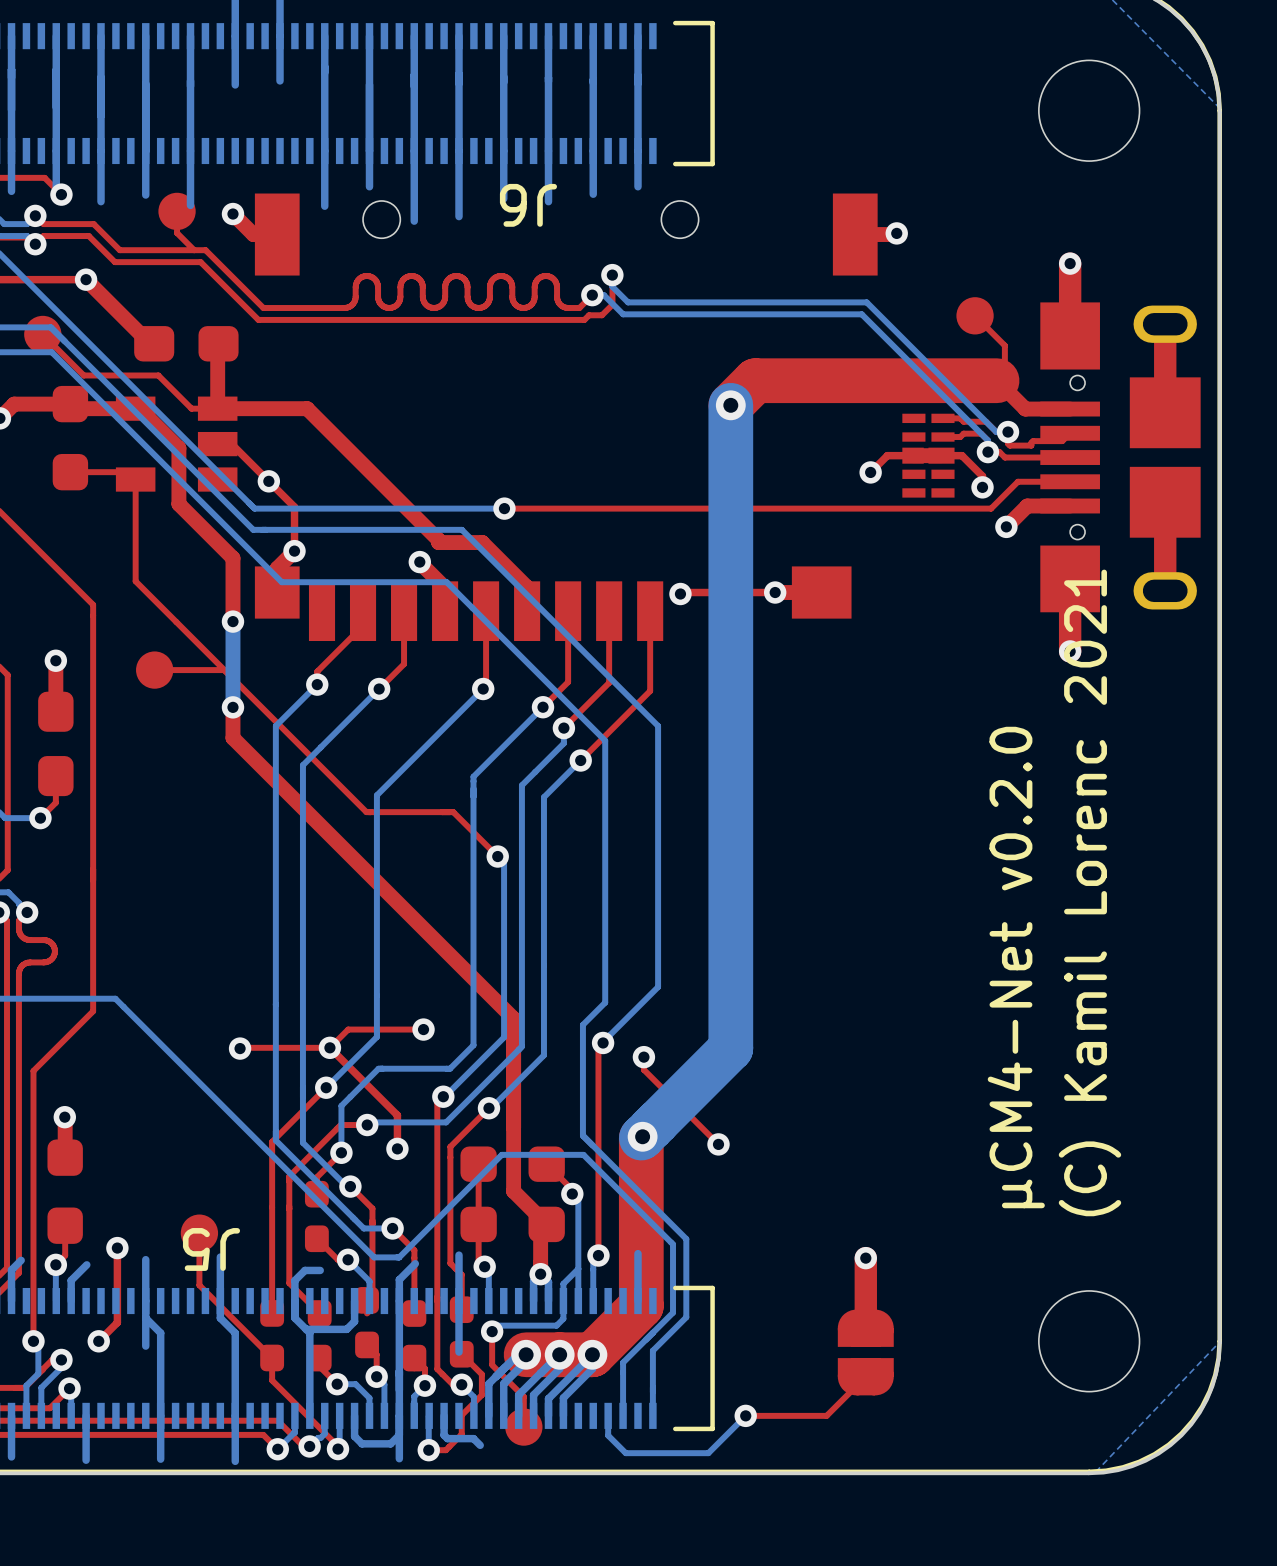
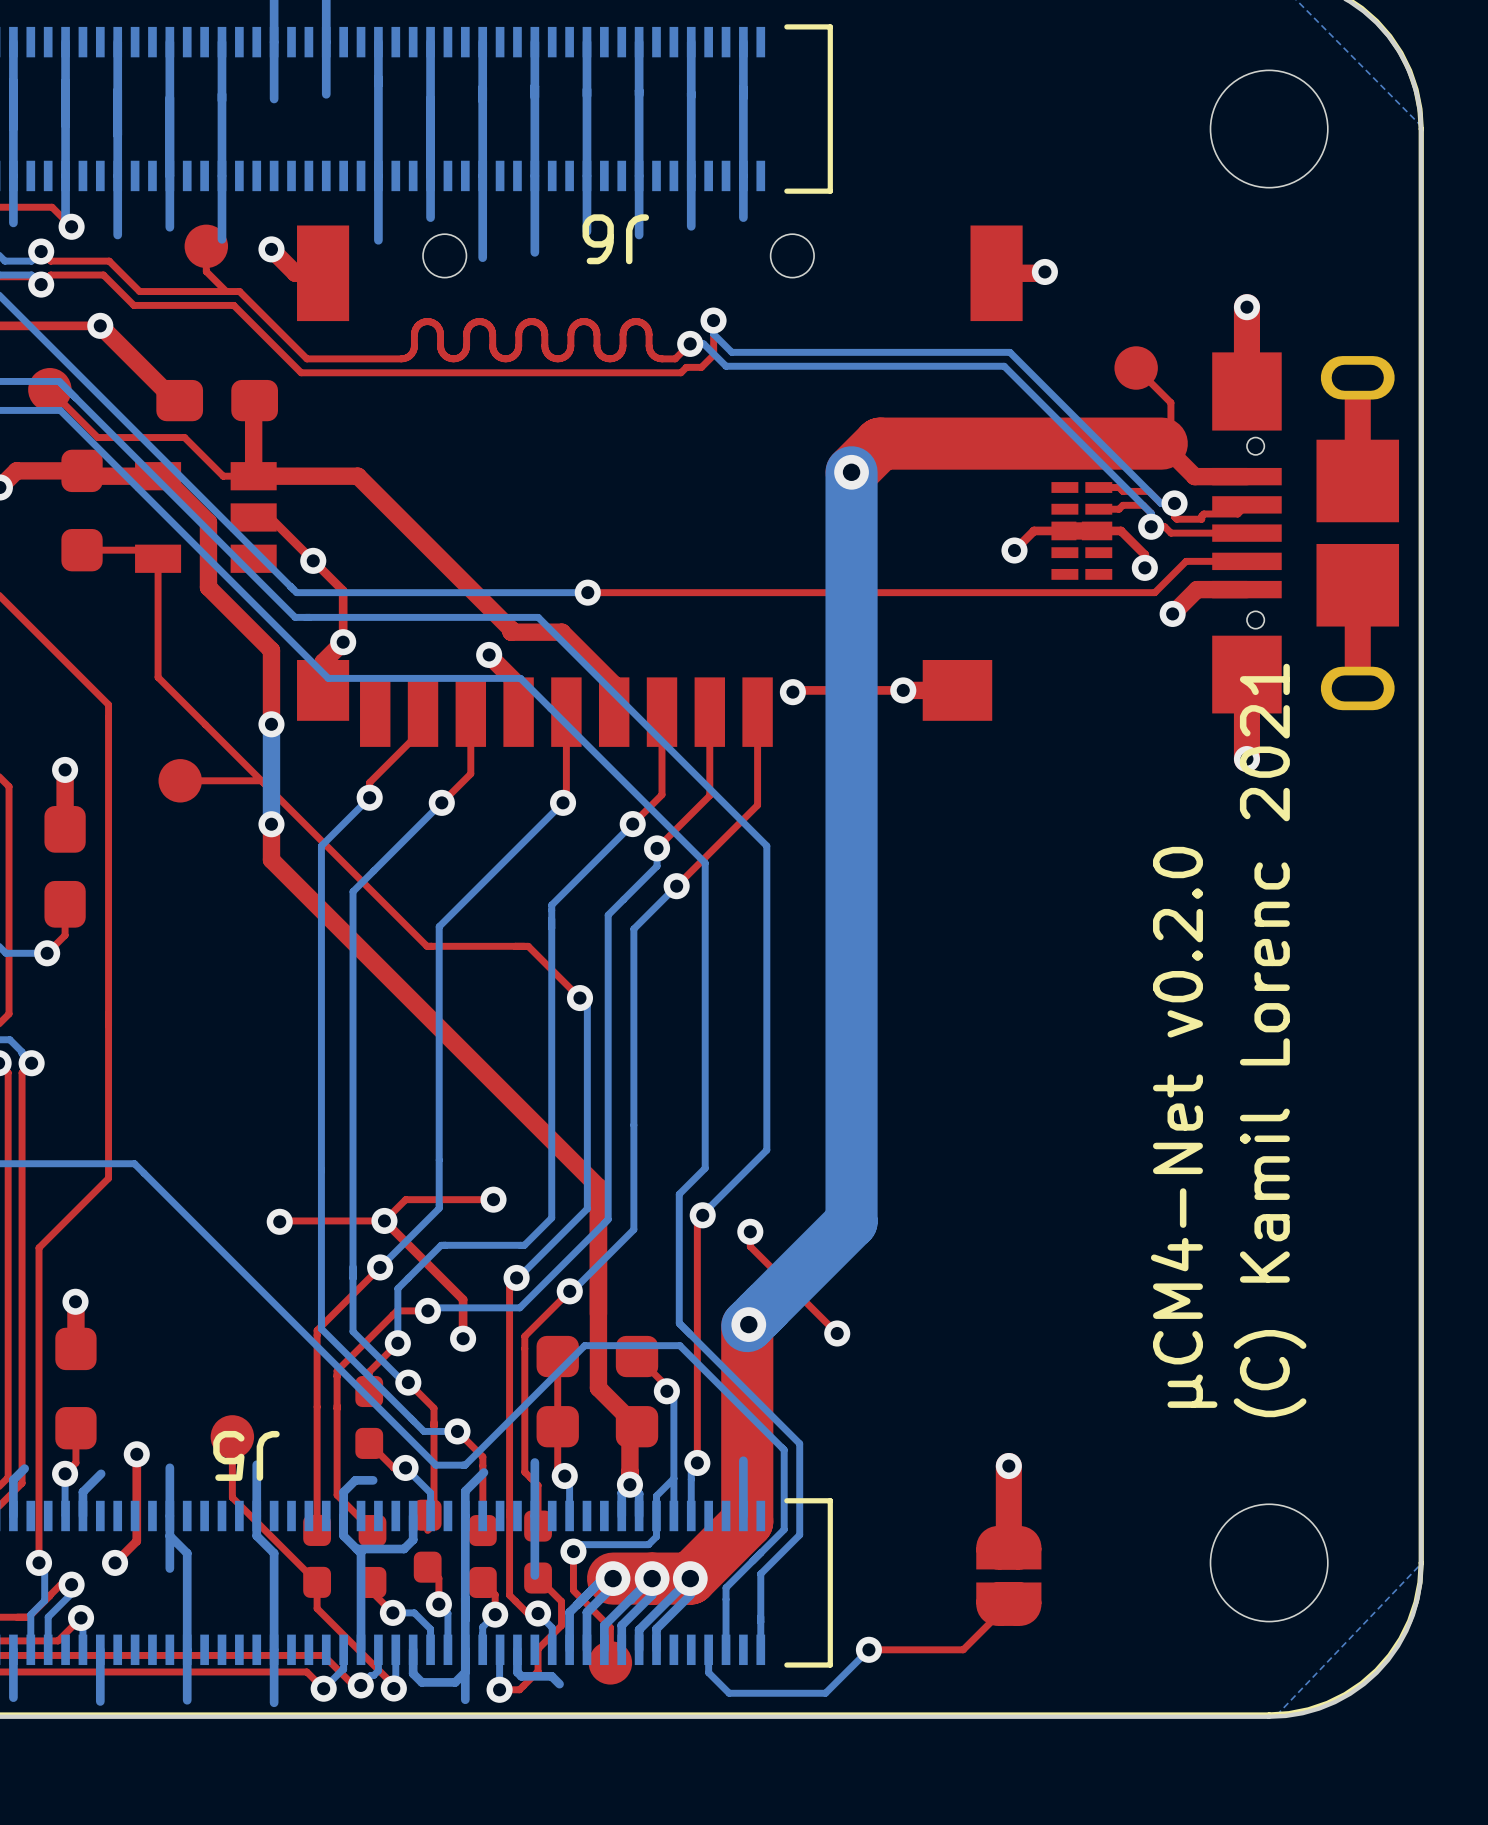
top track: (18, 928) (20, 933) (25, 938) (48, 941) (53, 946) (54, 951) (53, 956) (48, 961) (25, 963) (20, 968) (18, 973) -> (22, 1082) (22, 1134)

